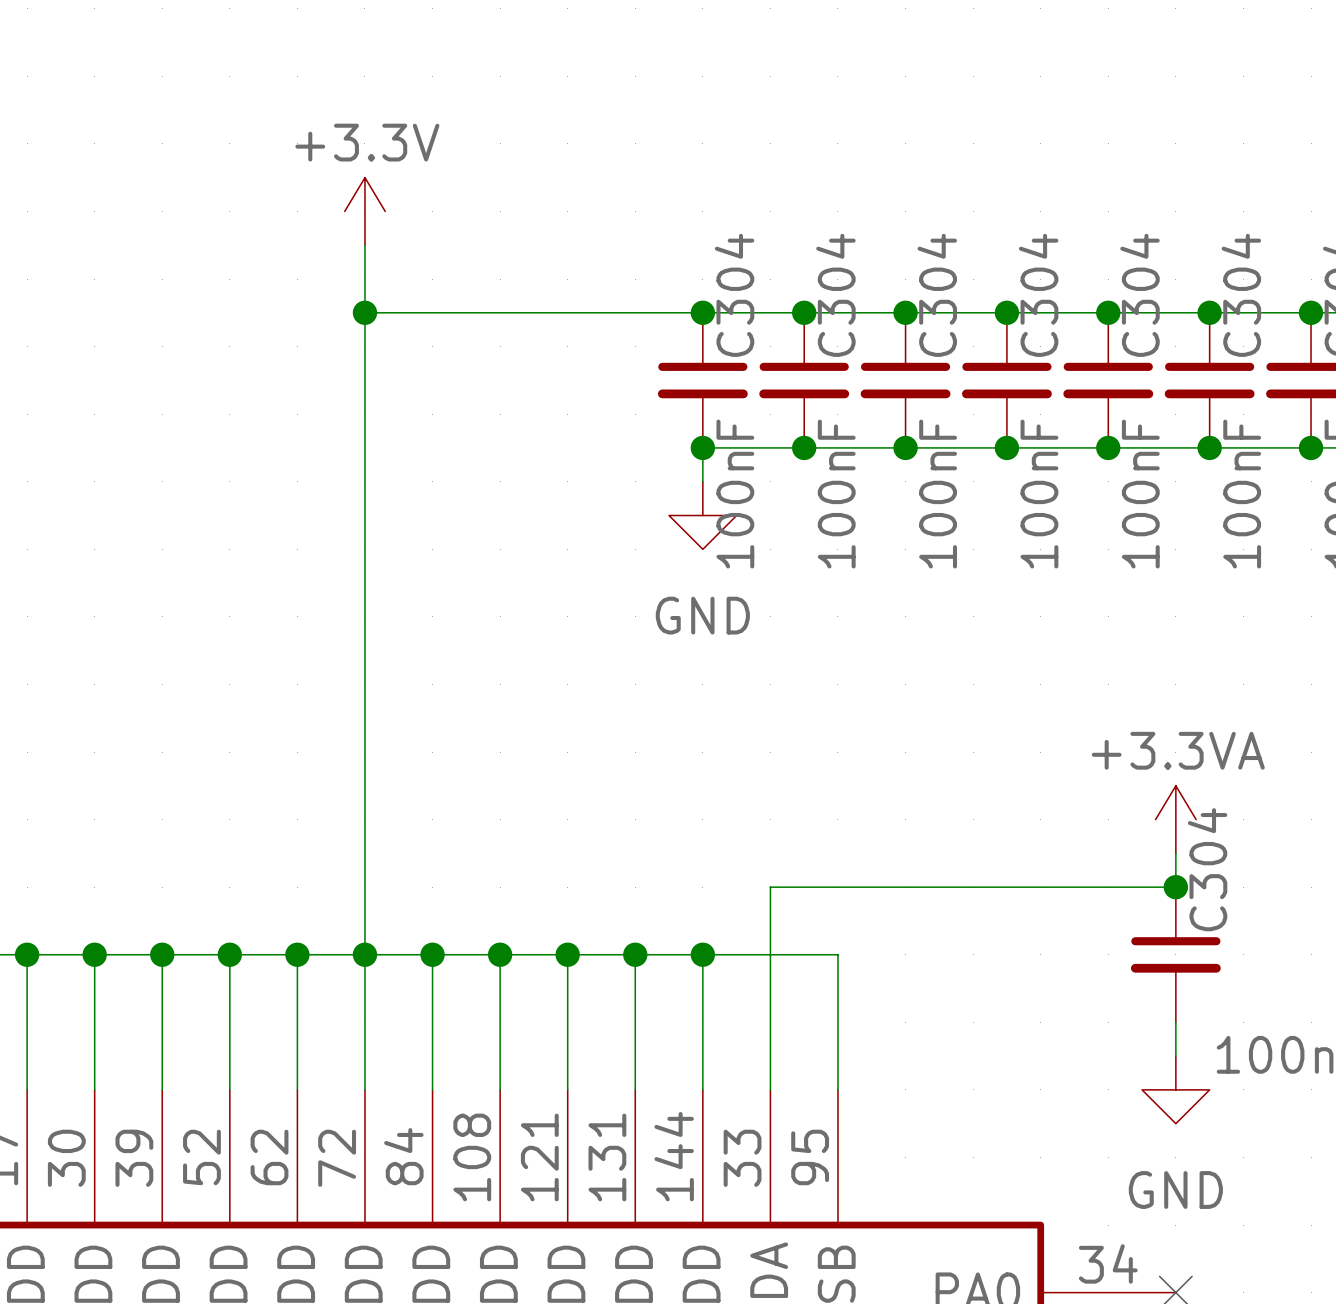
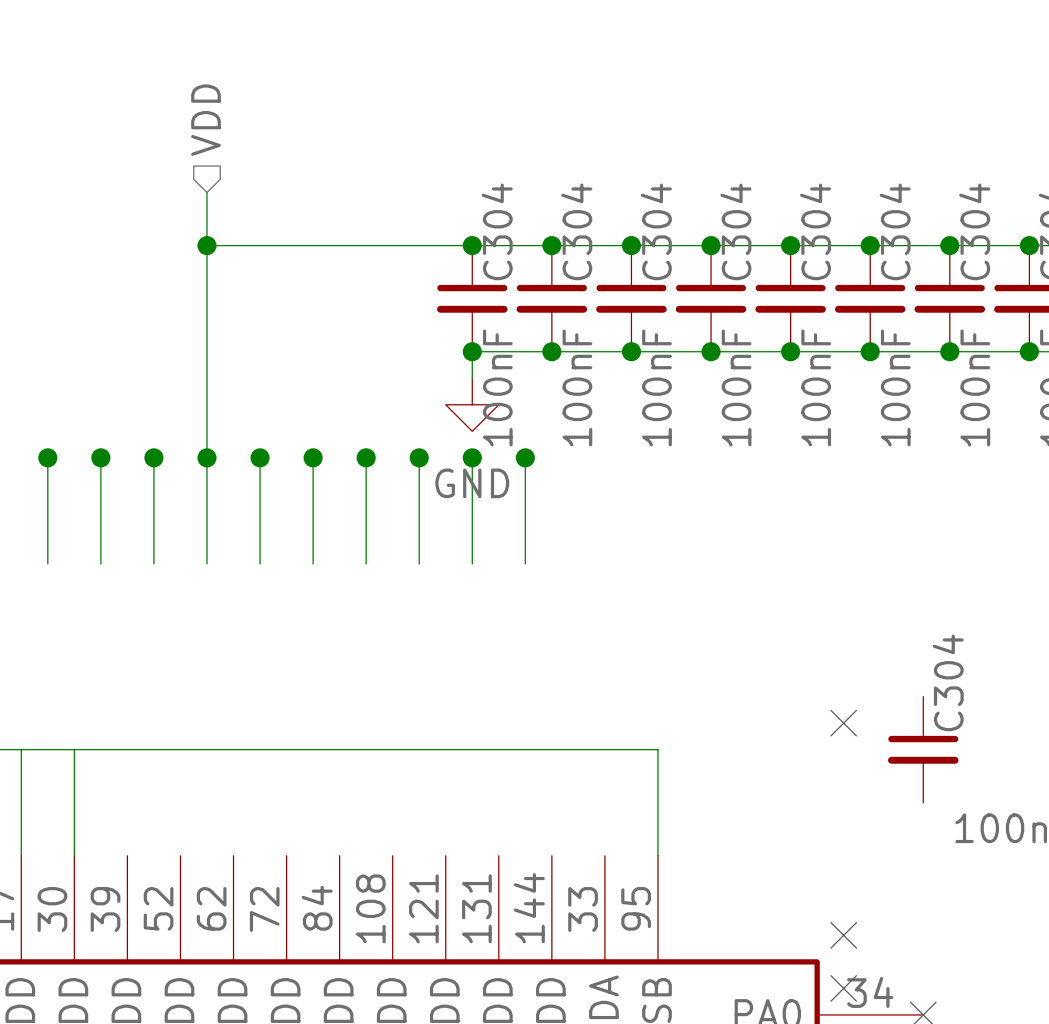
hierarchical label: none -> VDD (206, 120)
power symbol: +3.3V (364, 211) -> none
wire: none -> (206, 192) (206, 563)
wire: (364, 245) (364, 1089) -> none
wire: none -> (206, 245) (286, 245)
junction position: (364, 312) -> (206, 245)
junction: none -> (472, 245)
C304: none -> 100nF (472, 298)
junction: none -> (472, 351)
wire: (702, 447) (702, 481) -> (551, 351) (472, 351) (472, 378)
power symbol position: GND (702, 515) -> GND (472, 404)
junction: none -> (47, 457)
junction: none -> (100, 457)
junction: none -> (153, 457)
junction: none -> (206, 457)
junction: none -> (260, 457)
junction: none -> (313, 457)
junction: none -> (366, 457)
junction: none -> (419, 457)
junction: none -> (472, 457)
wire: none -> (525, 457) (525, 563)
junction: none -> (525, 457)
power symbol: +3.3VA (1175, 819) -> none
wire: (1175, 853) (1175, 887) (770, 887) (770, 1089) -> none
junction: (1175, 887) -> none
no-connect mark: none -> (843, 723)
junction: (27, 954) -> none
junction: (94, 954) -> none
wire: (162, 954) (162, 1089) -> (47, 457) (47, 563)
junction: (162, 954) -> none
wire: (229, 954) (229, 1089) -> (100, 457) (100, 563)
junction: (229, 954) -> none
wire: (297, 954) (297, 1089) -> (153, 457) (153, 563)
junction: (297, 954) -> none
junction: (364, 954) -> none
wire: (432, 954) (432, 1089) -> (260, 457) (260, 563)
junction: (432, 954) -> none
wire: (500, 954) (500, 1089) -> (313, 457) (313, 563)
junction: (500, 954) -> none
wire: (567, 954) (567, 1089) -> (366, 457) (366, 563)
junction: (567, 954) -> none
wire: (635, 954) (635, 1089) -> (419, 457) (419, 563)
junction: (635, 954) -> none
wire: (702, 954) (702, 1089) -> (472, 457) (472, 563)
junction: (702, 954) -> none
wire: (1175, 1022) (1175, 1056) -> none
power symbol: GND (1175, 1089) -> none
no-connect mark: none -> (843, 935)
no-connect mark: none -> (843, 988)

